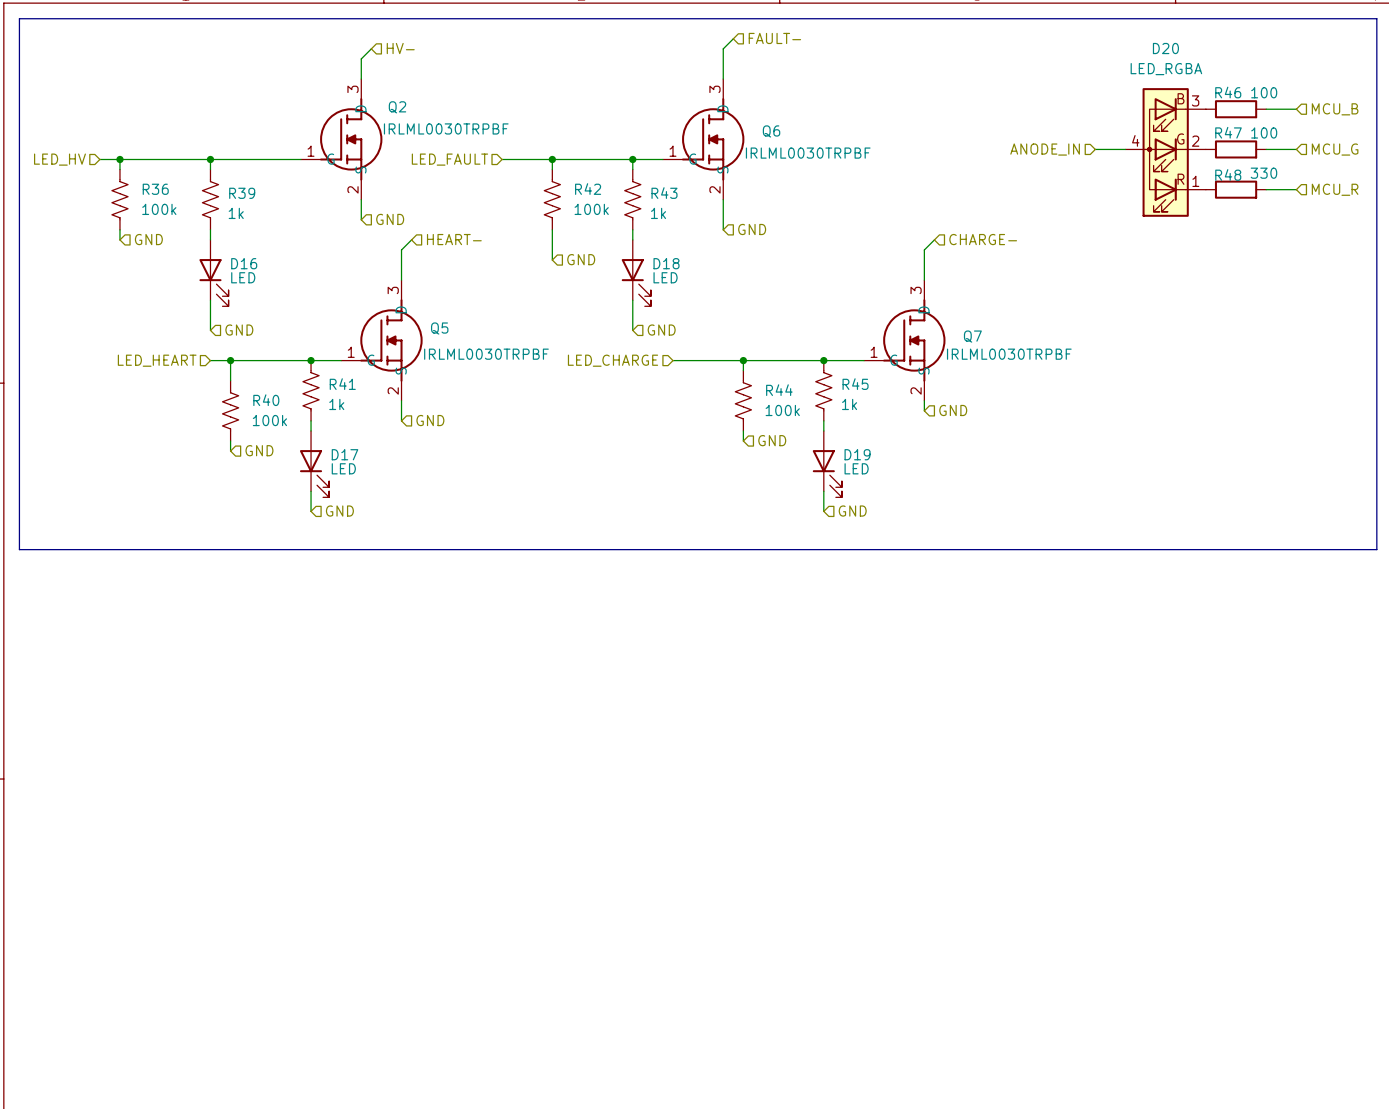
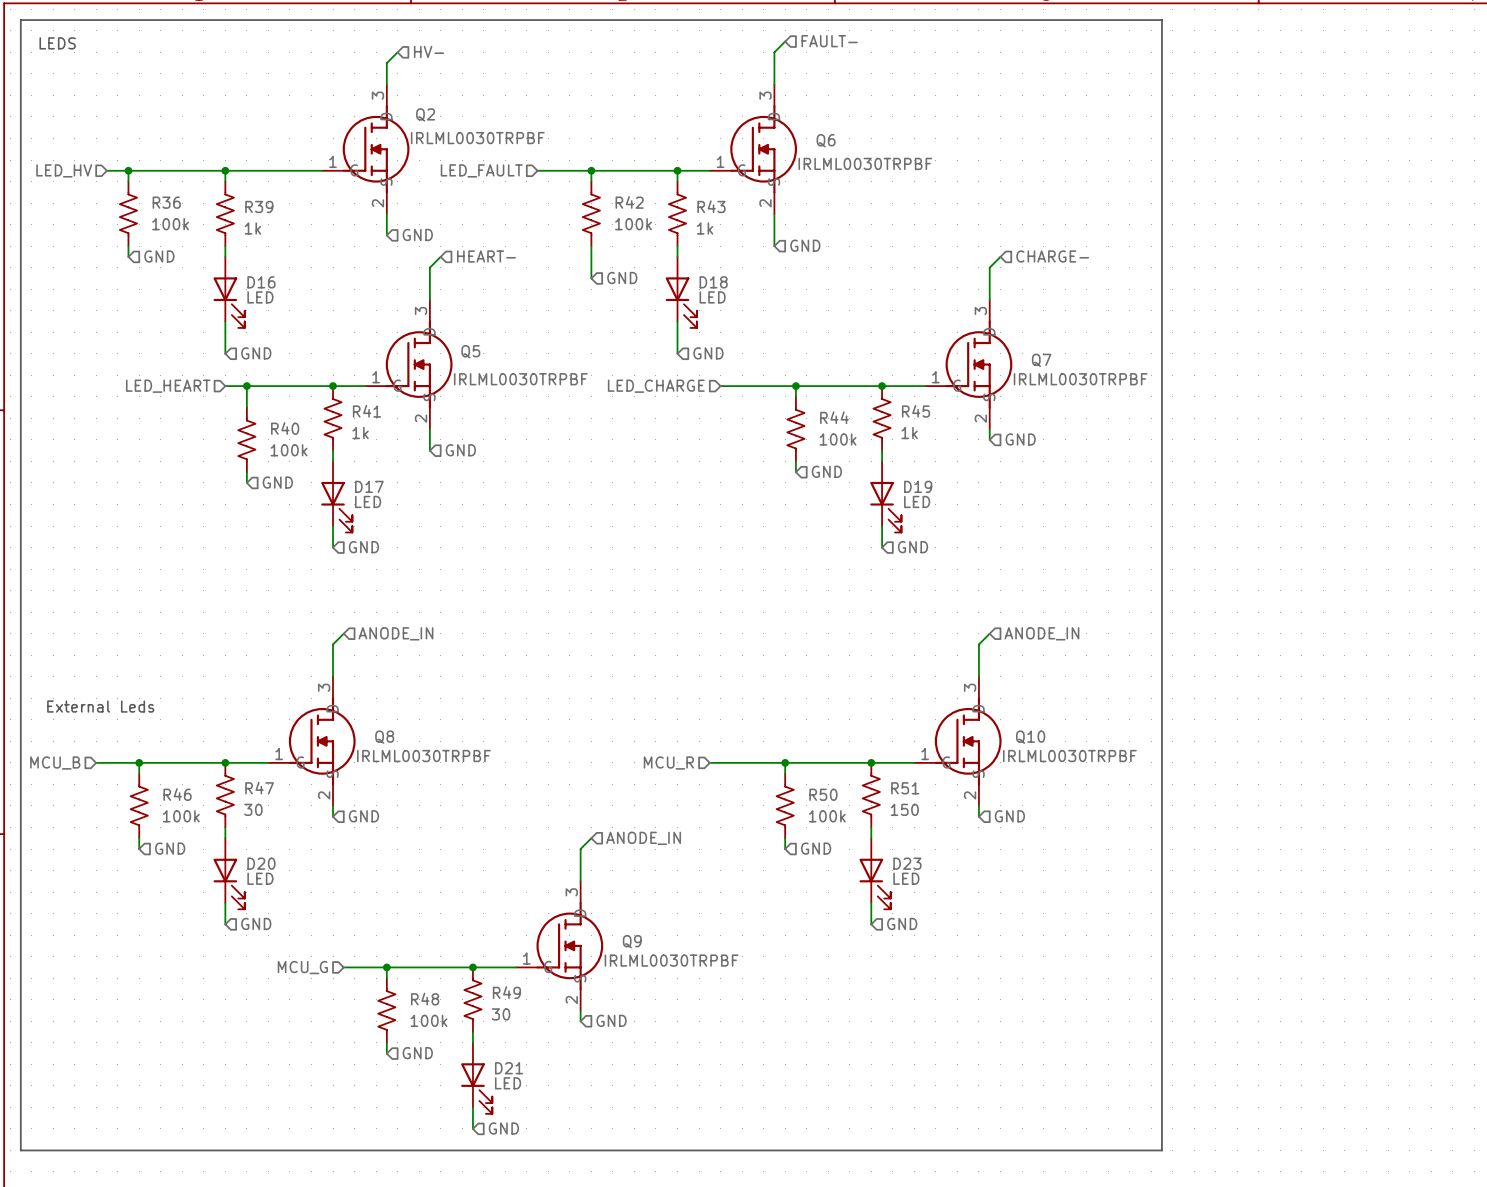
line: (1085, 18) (1376, 18) (1376, 549) (19, 549) -> (1161, 20) (1161, 1150) (20, 1150) (20, 588)
text: none -> LEDS (57, 43)
D20 name position: D20 (1165, 48) -> D20 (261, 863)
D20 value: LED_RGBA (1166, 69) -> LED (260, 878)
D20 symbol: [1125, 88, 1206, 217] -> [213, 838, 245, 910]
R46 name position: R46 (1228, 92) -> R46 (177, 794)
R46 value: 100 (1264, 92) -> 100k (181, 816)
R46 symbol: [1205, 100, 1267, 119] -> [130, 773, 148, 839]
wire: (1266, 109) (1296, 109) -> none
hierarchical label: MCU_B (1335, 109) -> none
R47 name position: R47 (1228, 132) -> R47 (259, 788)
R47 value: 100 (1264, 132) -> 30 (253, 809)
R47 symbol: [1205, 140, 1267, 159] -> [216, 762, 234, 828]
hierarchical label: ANODE_IN (1045, 149) -> none
wire: (1095, 149) (1125, 149) -> none
wire: (1266, 149) (1296, 149) -> none
hierarchical label: MCU_G (1335, 149) -> none
R48 value: 330 (1263, 173) -> 100k (428, 1020)
R48 name position: R48 (1228, 174) -> R48 (425, 999)
R48 symbol: [1205, 180, 1267, 199] -> [378, 978, 396, 1043]
wire: (1266, 189) (1296, 189) -> none
hierarchical label: MCU_R (1335, 189) -> none
wire: none -> (343, 633) (333, 644) (333, 676)
hierarchical label: none -> ANODE_IN (395, 633)
wire: none -> (989, 633) (978, 644) (978, 676)
hierarchical label: none -> ANODE_IN (1041, 633)
text: none -> External Leds (100, 706)
Q8: none -> IRLML0030TRPBF (312, 741)
Q10: none -> IRLML0030TRPBF (957, 741)
hierarchical label: none -> MCU_B (55, 762)
wire: none -> (96, 762) (268, 762)
wire: none -> (139, 762) (139, 773)
junction: none -> (139, 762)
junction: none -> (225, 762)
hierarchical label: none -> MCU_R (668, 762)
wire: none -> (709, 762) (914, 762)
wire: none -> (785, 762) (785, 773)
junction: none -> (785, 762)
junction: none -> (871, 762)
R51: none -> 150 (871, 795)
wire: none -> (333, 805) (333, 816)
R50: none -> 100k (785, 805)
wire: none -> (978, 805) (978, 816)
hierarchical label: none -> GND (363, 816)
hierarchical label: none -> GND (1009, 816)
wire: none -> (225, 827) (225, 838)
wire: none -> (871, 827) (871, 838)
wire: none -> (139, 838) (139, 849)
wire: none -> (591, 838) (580, 849) (580, 881)
hierarchical label: none -> ANODE_IN (643, 838)
wire: none -> (785, 838) (785, 849)
hierarchical label: none -> GND (170, 848)
hierarchical label: none -> GND (816, 848)
D23: none -> LED (875, 873)
wire: none -> (225, 902) (225, 924)
wire: none -> (871, 902) (871, 924)
hierarchical label: none -> GND (256, 923)
hierarchical label: none -> GND (902, 923)
Q9: none -> IRLML0030TRPBF (559, 945)
hierarchical label: none -> MCU_G (302, 967)
wire: none -> (343, 967) (516, 967)
wire: none -> (386, 967) (386, 978)
junction: none -> (386, 967)
junction: none -> (472, 967)
R49: none -> 30 (472, 999)
wire: none -> (580, 1010) (580, 1021)
hierarchical label: none -> GND (611, 1020)
wire: none -> (472, 1032) (472, 1042)
wire: none -> (386, 1042) (386, 1053)
hierarchical label: none -> GND (417, 1053)
D21: none -> LED (476, 1078)
wire: none -> (472, 1107) (472, 1128)
hierarchical label: none -> GND (503, 1128)

